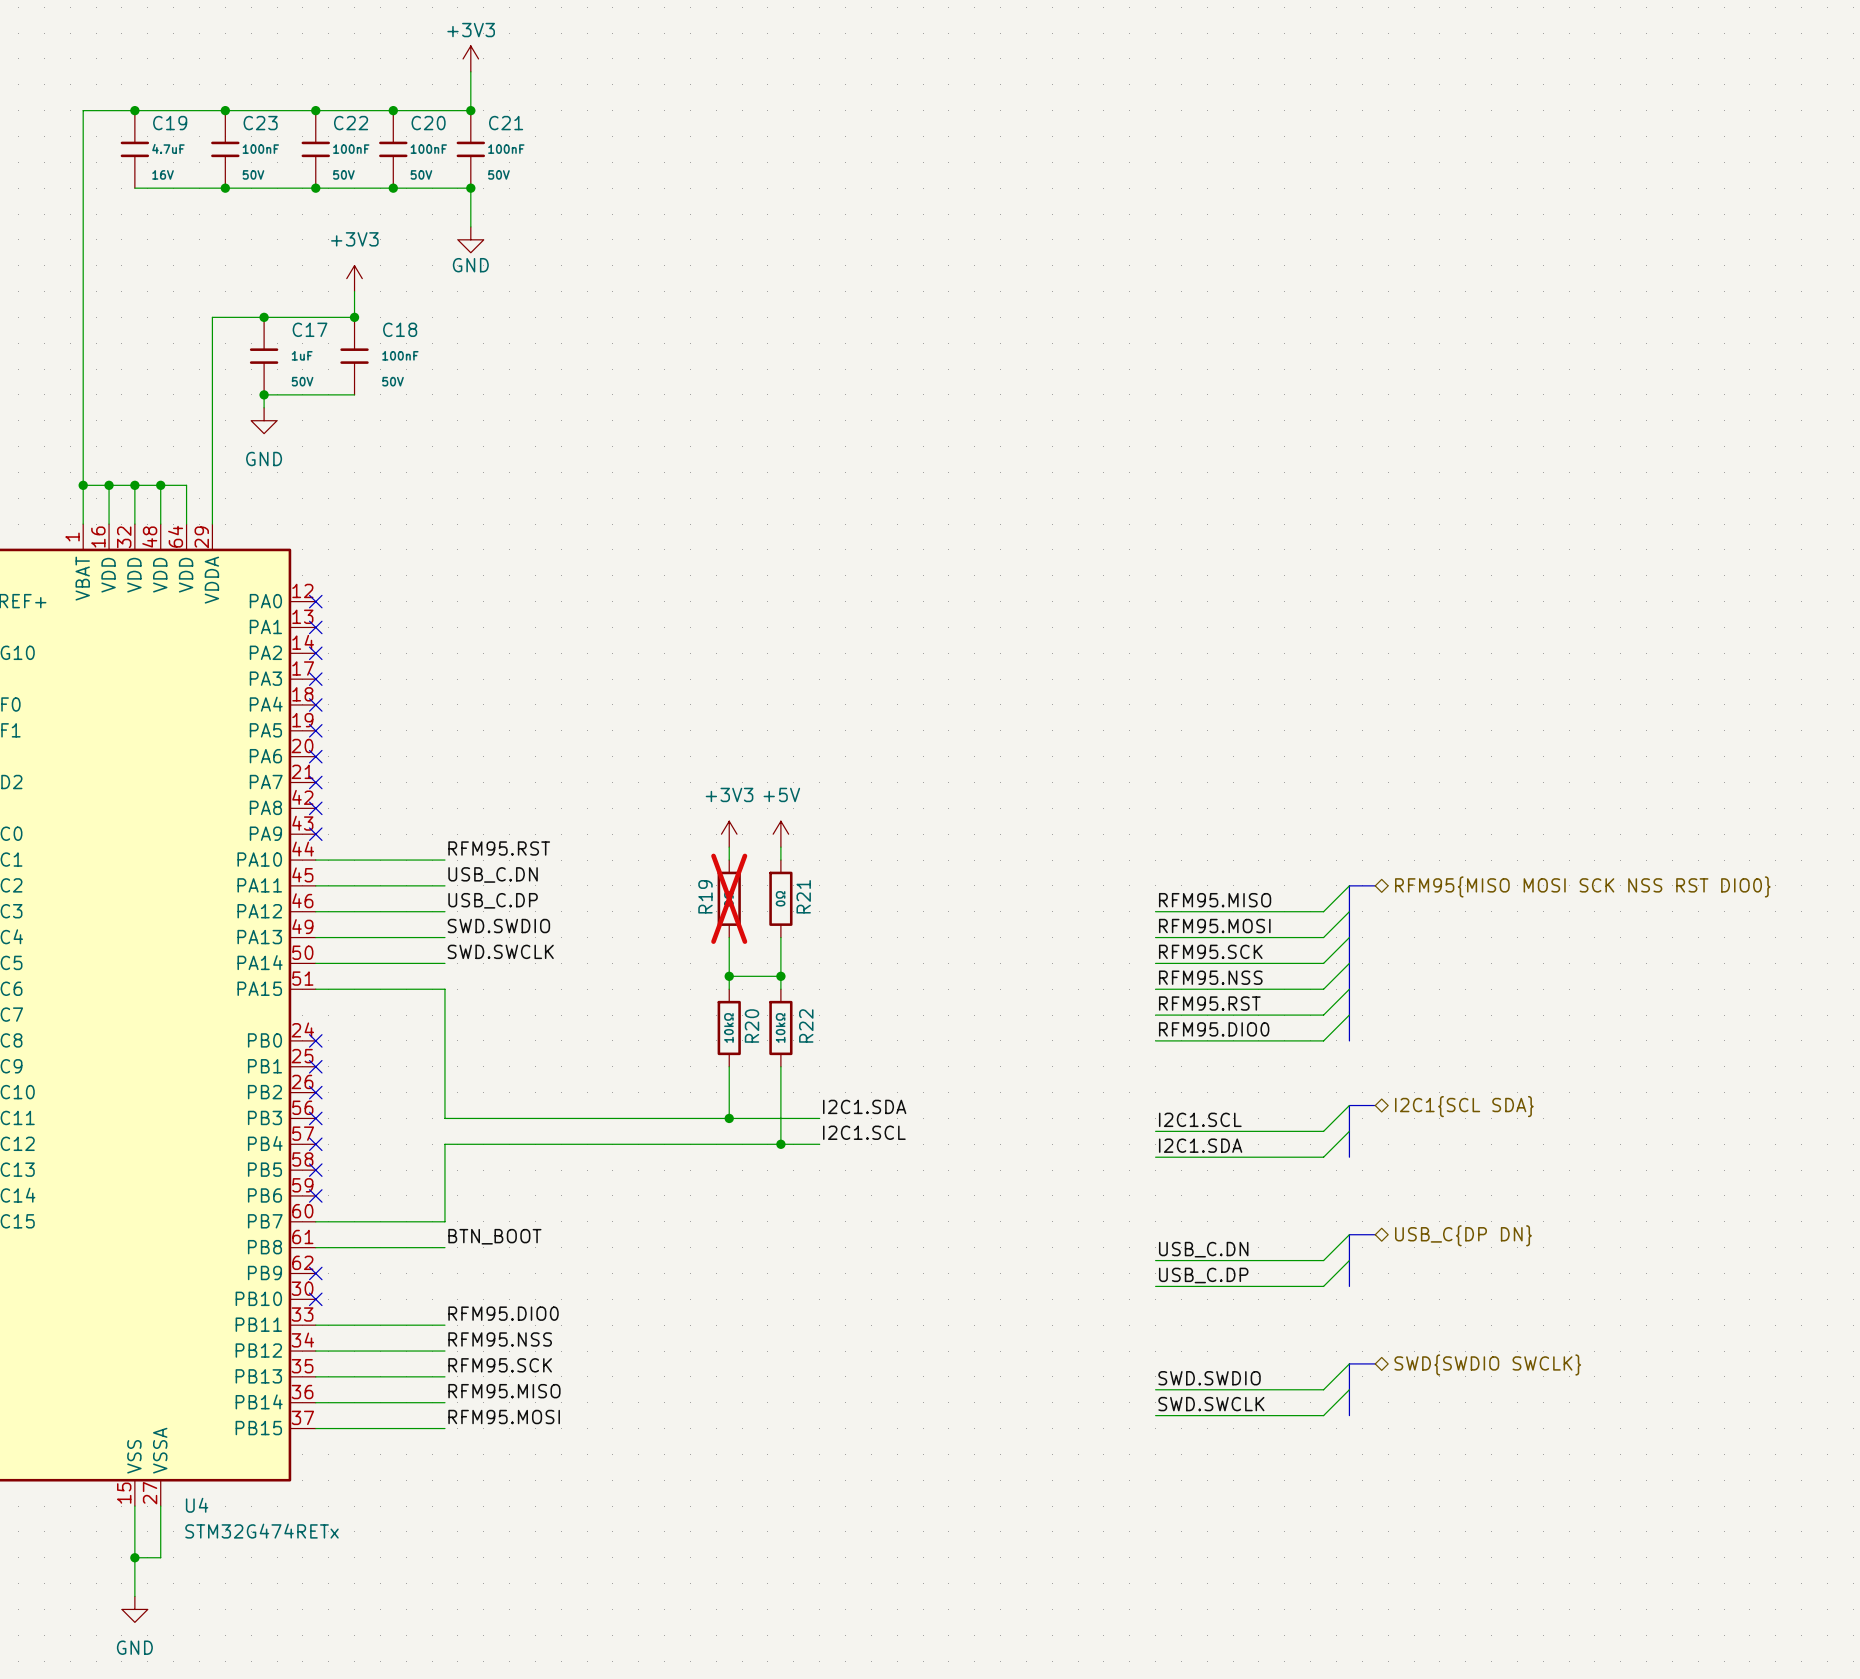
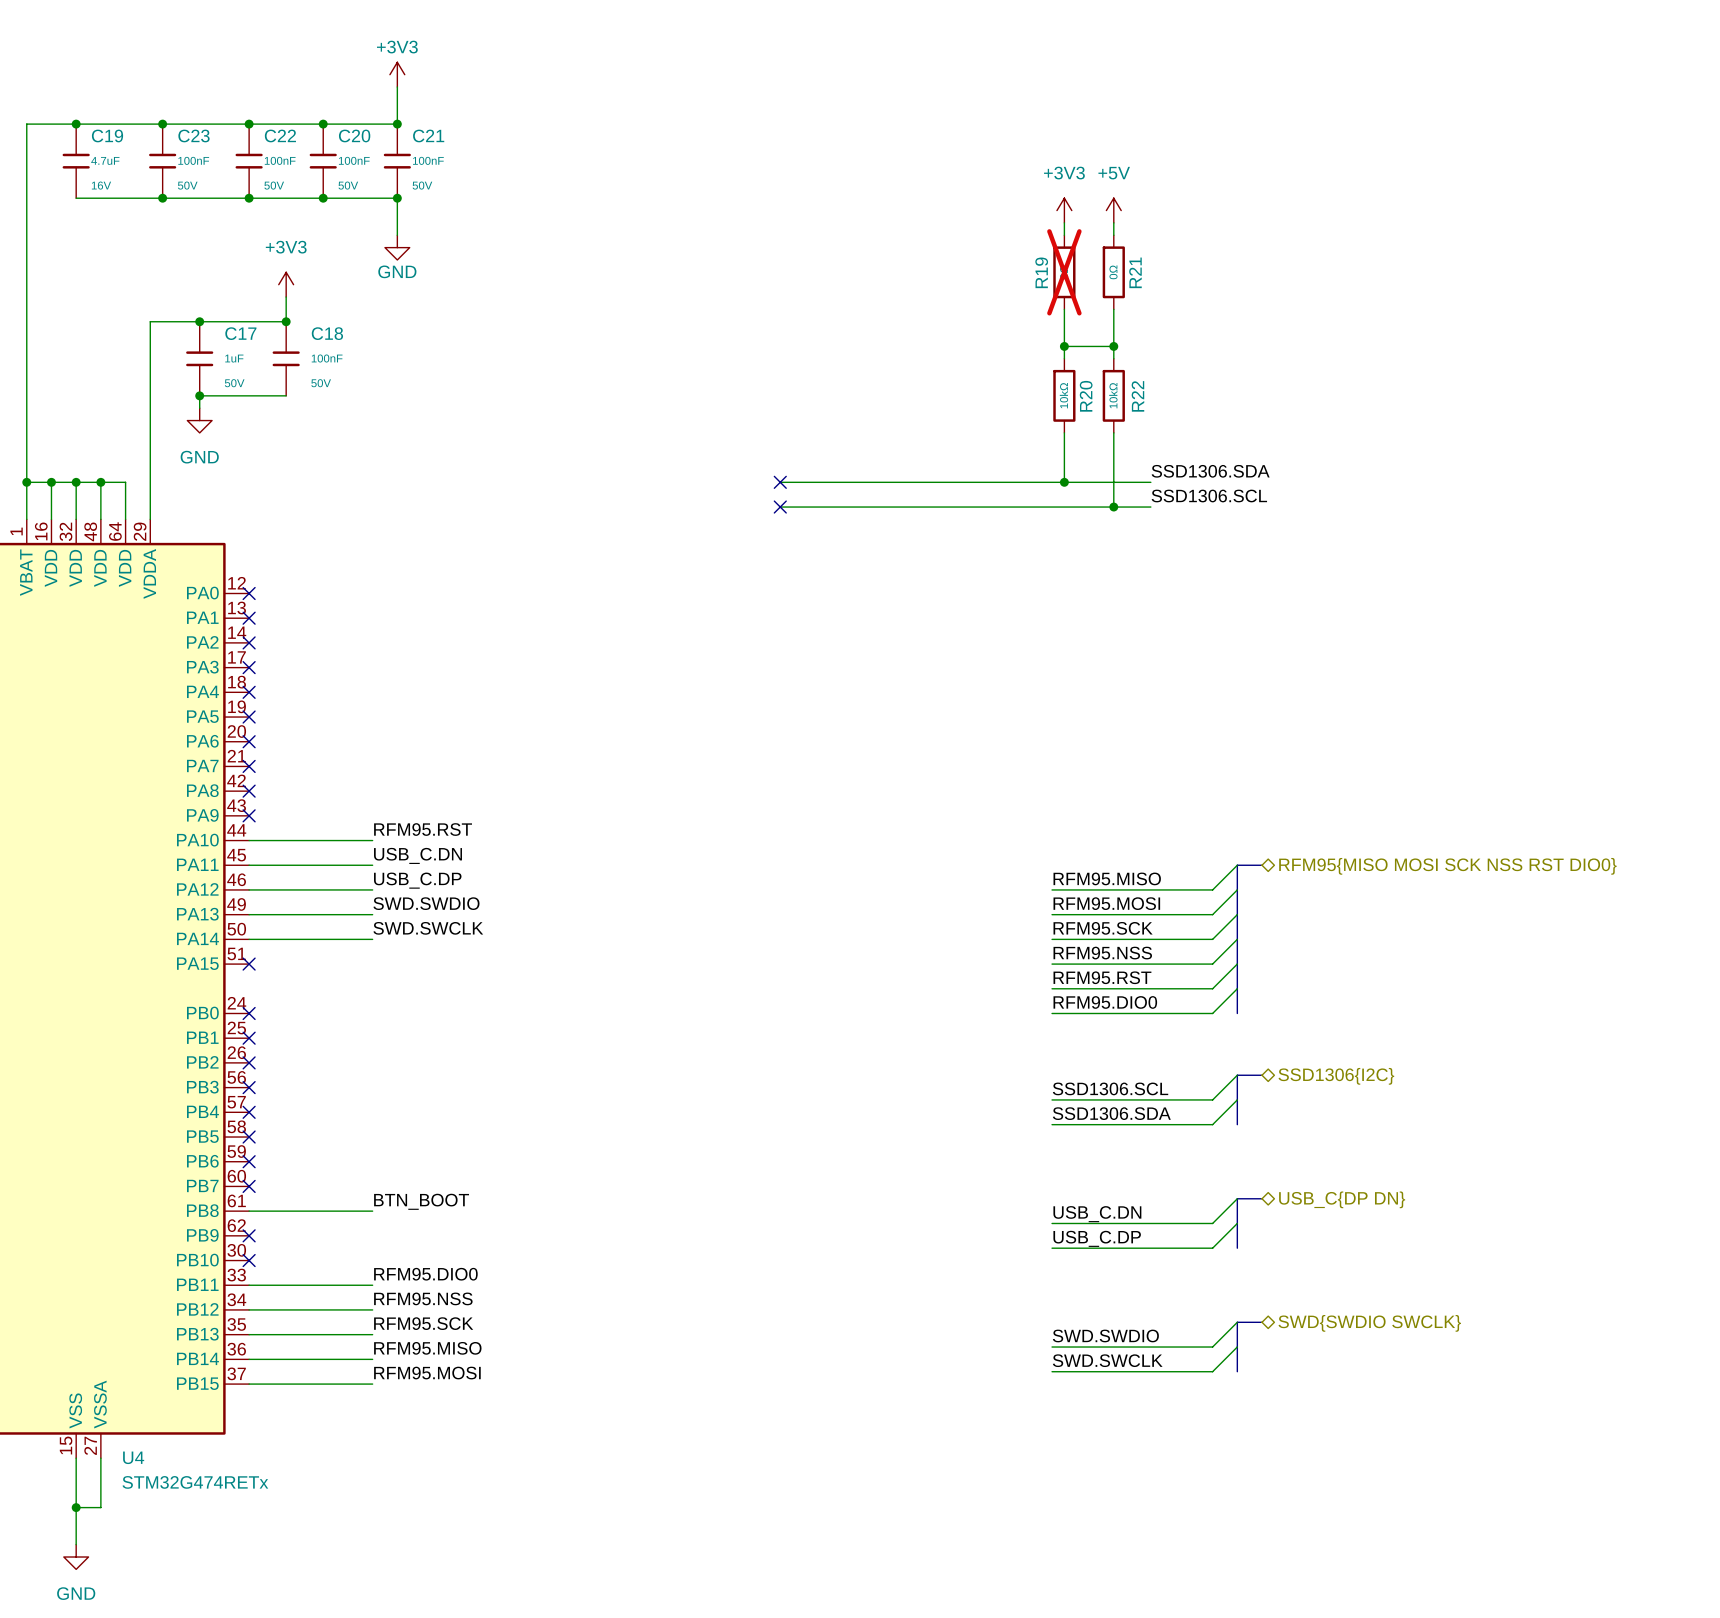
power symbol: none -> +3V3 (1064, 210)
power symbol: none -> +5V (1113, 210)
wire: none -> (1064, 222) (1064, 235)
wire: none -> (1113, 222) (1113, 235)
wire: none -> (1064, 309) (1064, 358)
wire: none -> (1113, 309) (1113, 358)
wire: none -> (1064, 346) (1113, 346)
junction: none -> (1064, 346)
junction: none -> (1113, 346)
wire: none -> (1064, 432) (1064, 482)
wire: none -> (1113, 432) (1113, 507)
label: none -> SSD1306.SDA (1210, 471)
wire: none -> (780, 482) (1150, 482)
no-connect mark: none -> (780, 482)
junction: none -> (1064, 482)
label: none -> SSD1306.SCL (1209, 496)
wire: none -> (780, 507) (1150, 507)
no-connect mark: none -> (780, 507)
junction: none -> (1113, 507)
power symbol: +3V3 (729, 834) -> none
power symbol: +5V (780, 834) -> none
wire: (729, 847) (729, 860) -> none
wire: (780, 847) (780, 860) -> none
R19 position: (729, 898) -> (1064, 272)
R21 position: (780, 898) -> (1113, 272)
wire: (729, 937) (729, 989) -> none
wire: (780, 937) (780, 989) -> none
wire: (729, 976) (780, 976) -> none
junction: (729, 976) -> none
junction: (780, 976) -> none
wire: (315, 989) (444, 989) (444, 1118) (819, 1118) -> none
no-connect mark: none -> (249, 964)
R20 position: (729, 1028) -> (1064, 395)
R22 position: (780, 1028) -> (1113, 395)
wire: (729, 1066) (729, 1118) -> none
wire: (780, 1066) (780, 1144) -> none
label: I2C1.SDA (864, 1106) -> none
hierarchical label: I2C1{SCL SDA} (1464, 1106) -> SSD1306{I2C} (1336, 1076)
junction: (729, 1118) -> none
label: I2C1.SCL (1200, 1119) -> SSD1306.SCL (1110, 1088)
label: I2C1.SCL (864, 1132) -> none
junction: (780, 1144) -> none
wire: (819, 1144) (444, 1144) (444, 1221) (315, 1221) -> none
label: I2C1.SDA (1200, 1145) -> SSD1306.SDA (1111, 1113)
no-connect mark: none -> (249, 1186)

